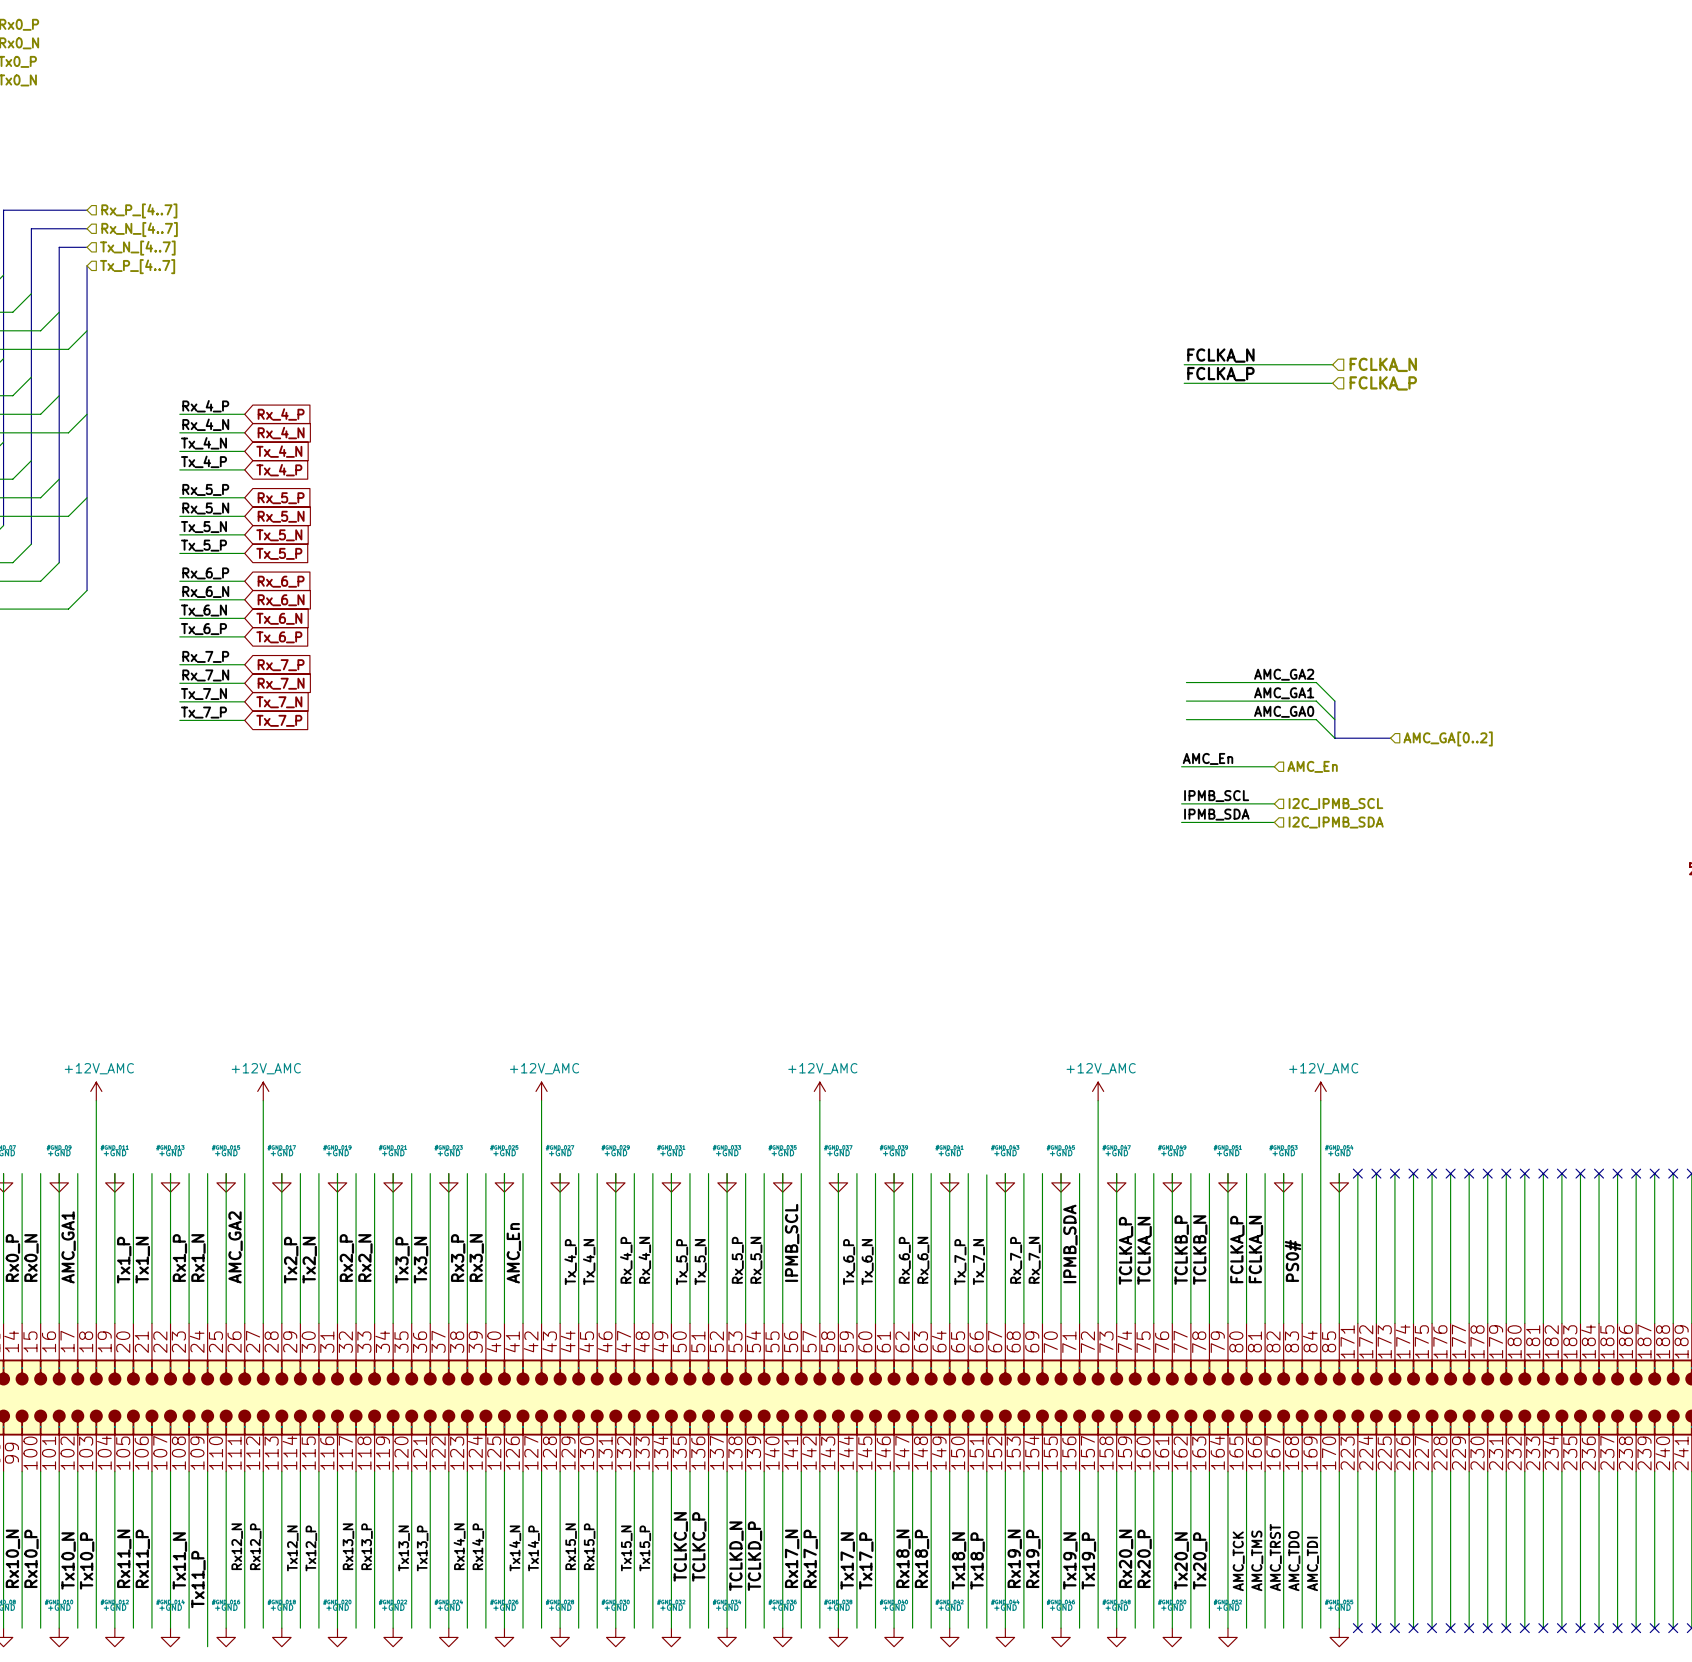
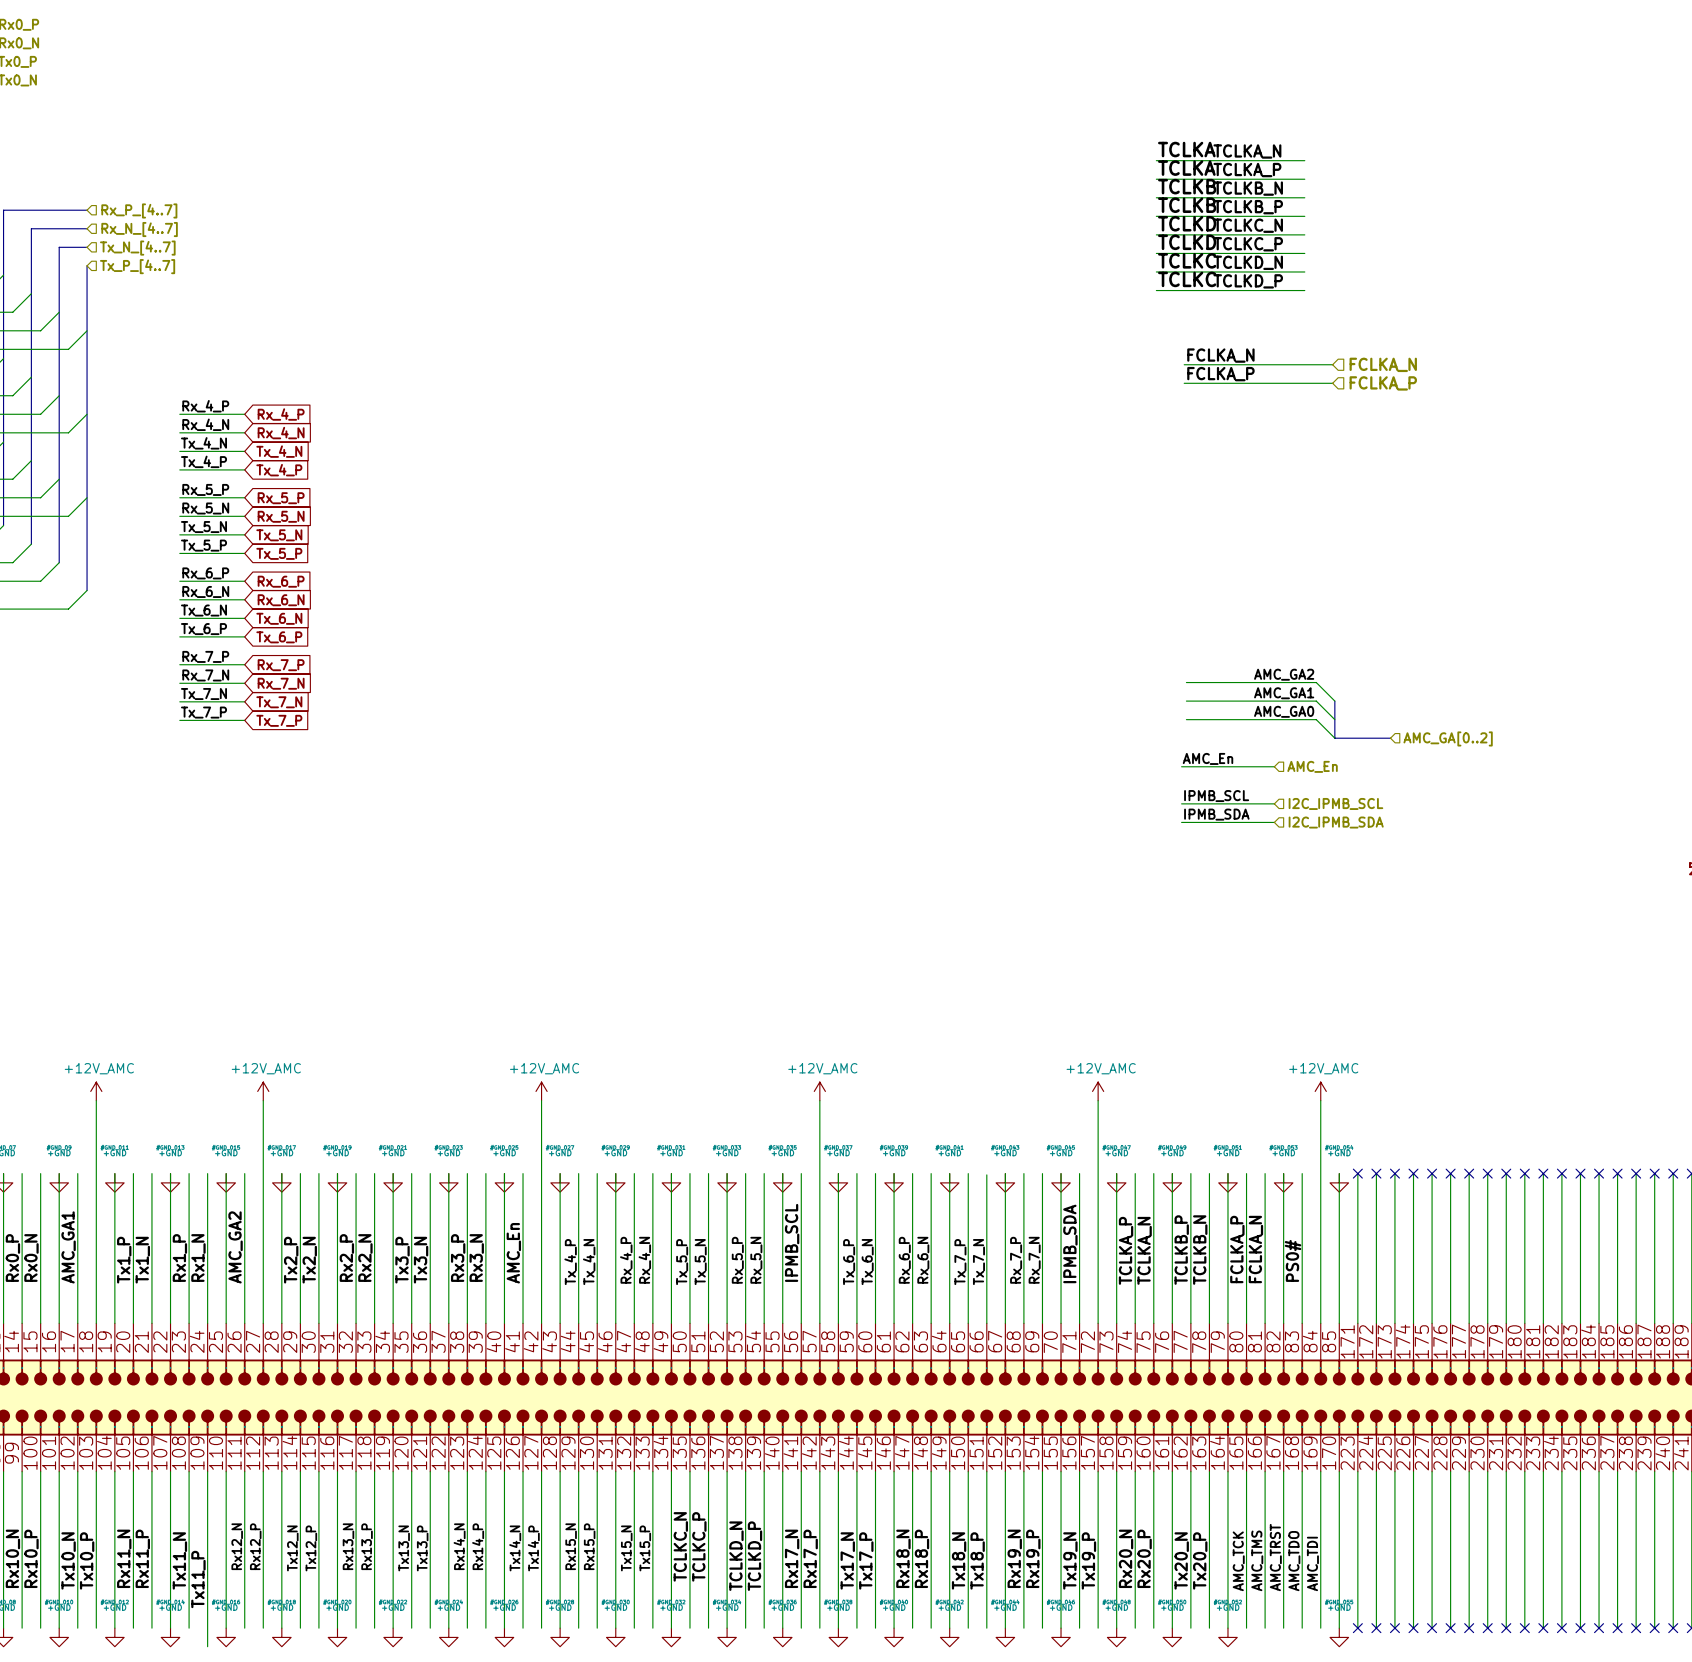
label: none -> TCLKA (1186, 149)
label: none -> TCLKA_N (1247, 151)
wire: none -> (1156, 160) (1304, 160)
label: none -> TCLKA (1186, 168)
label: none -> TCLKA_P (1247, 170)
wire: none -> (1156, 179) (1304, 179)
label: none -> TCLKB (1187, 186)
label: none -> TCLKB_N (1248, 188)
wire: none -> (1156, 197) (1304, 197)
label: none -> TCLKB (1187, 205)
label: none -> TCLKB_P (1248, 207)
wire: none -> (1156, 216) (1304, 216)
label: none -> TCLKD (1187, 223)
label: none -> TCLKC_N (1248, 225)
wire: none -> (1156, 234) (1304, 234)
label: none -> TCLKD (1187, 242)
label: none -> TCLKC_P (1248, 244)
wire: none -> (1156, 253) (1304, 253)
label: none -> TCLKC (1187, 260)
label: none -> TCLKD_N (1248, 262)
wire: none -> (1156, 271) (1304, 271)
label: none -> TCLKC (1187, 279)
label: none -> TCLKD_P (1248, 281)
wire: none -> (1156, 290) (1304, 290)

